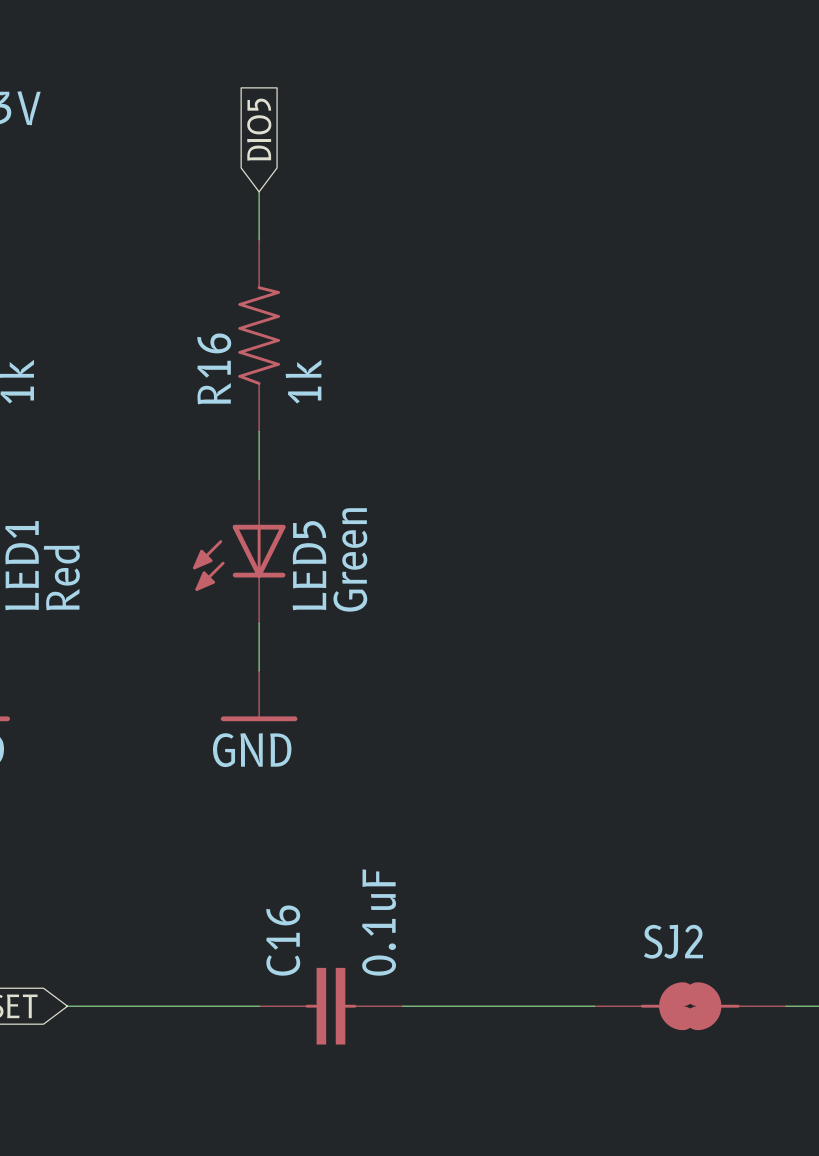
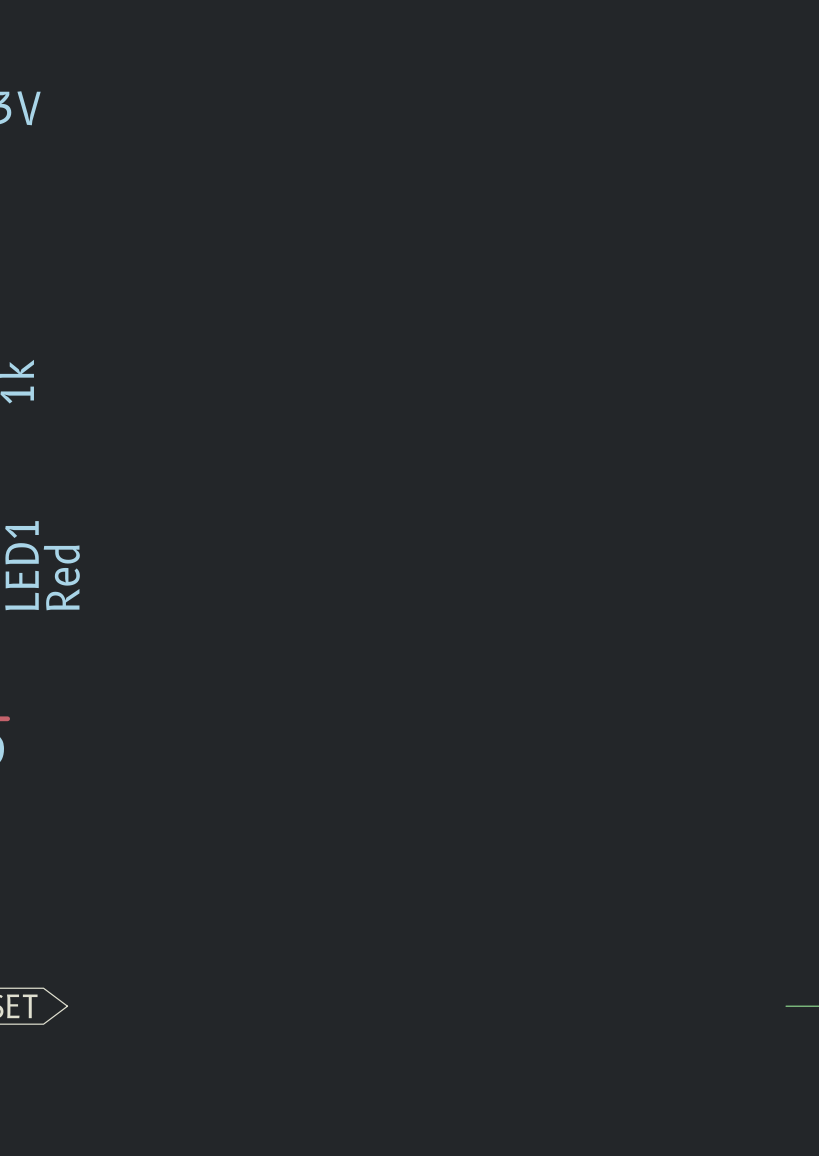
global label: DIO5 (259, 129) -> none
wire: (259, 191) (259, 239) -> none
R16: 1k (259, 335) -> none
wire: (259, 431) (259, 479) -> none
LED5: Green (239, 551) -> none
wire: (259, 622) (259, 670) -> none
power symbol: GND (259, 696) -> none
wire: (67, 1006) (259, 1006) -> none
C16: 0.1uF (330, 1006) -> none
wire: (402, 1006) (594, 1006) -> none
SJ2: (690, 1006) -> none

